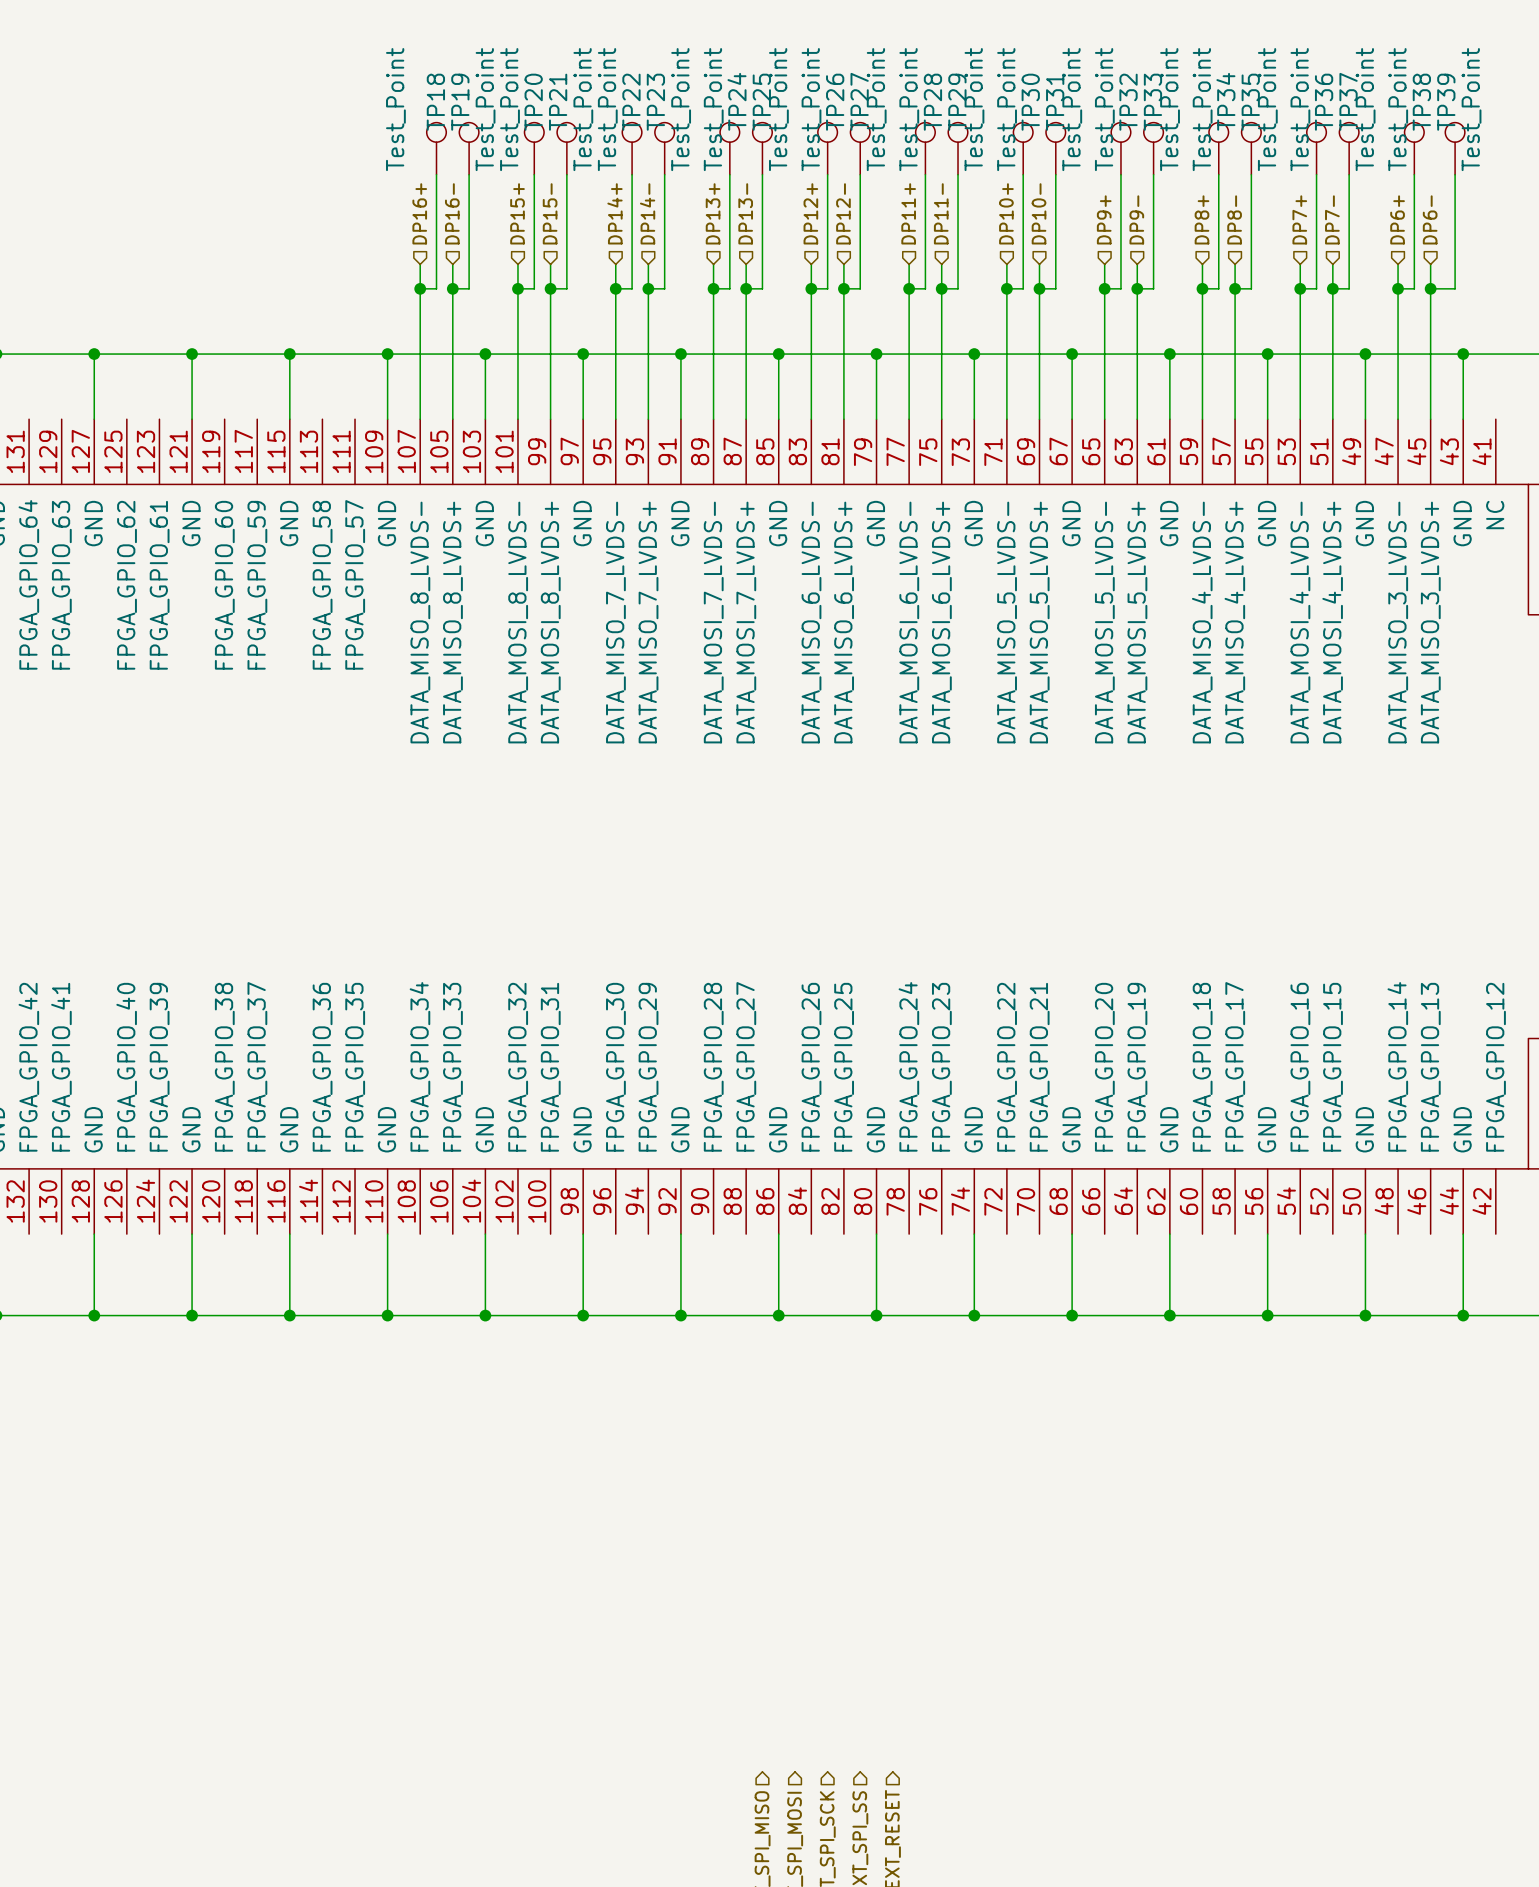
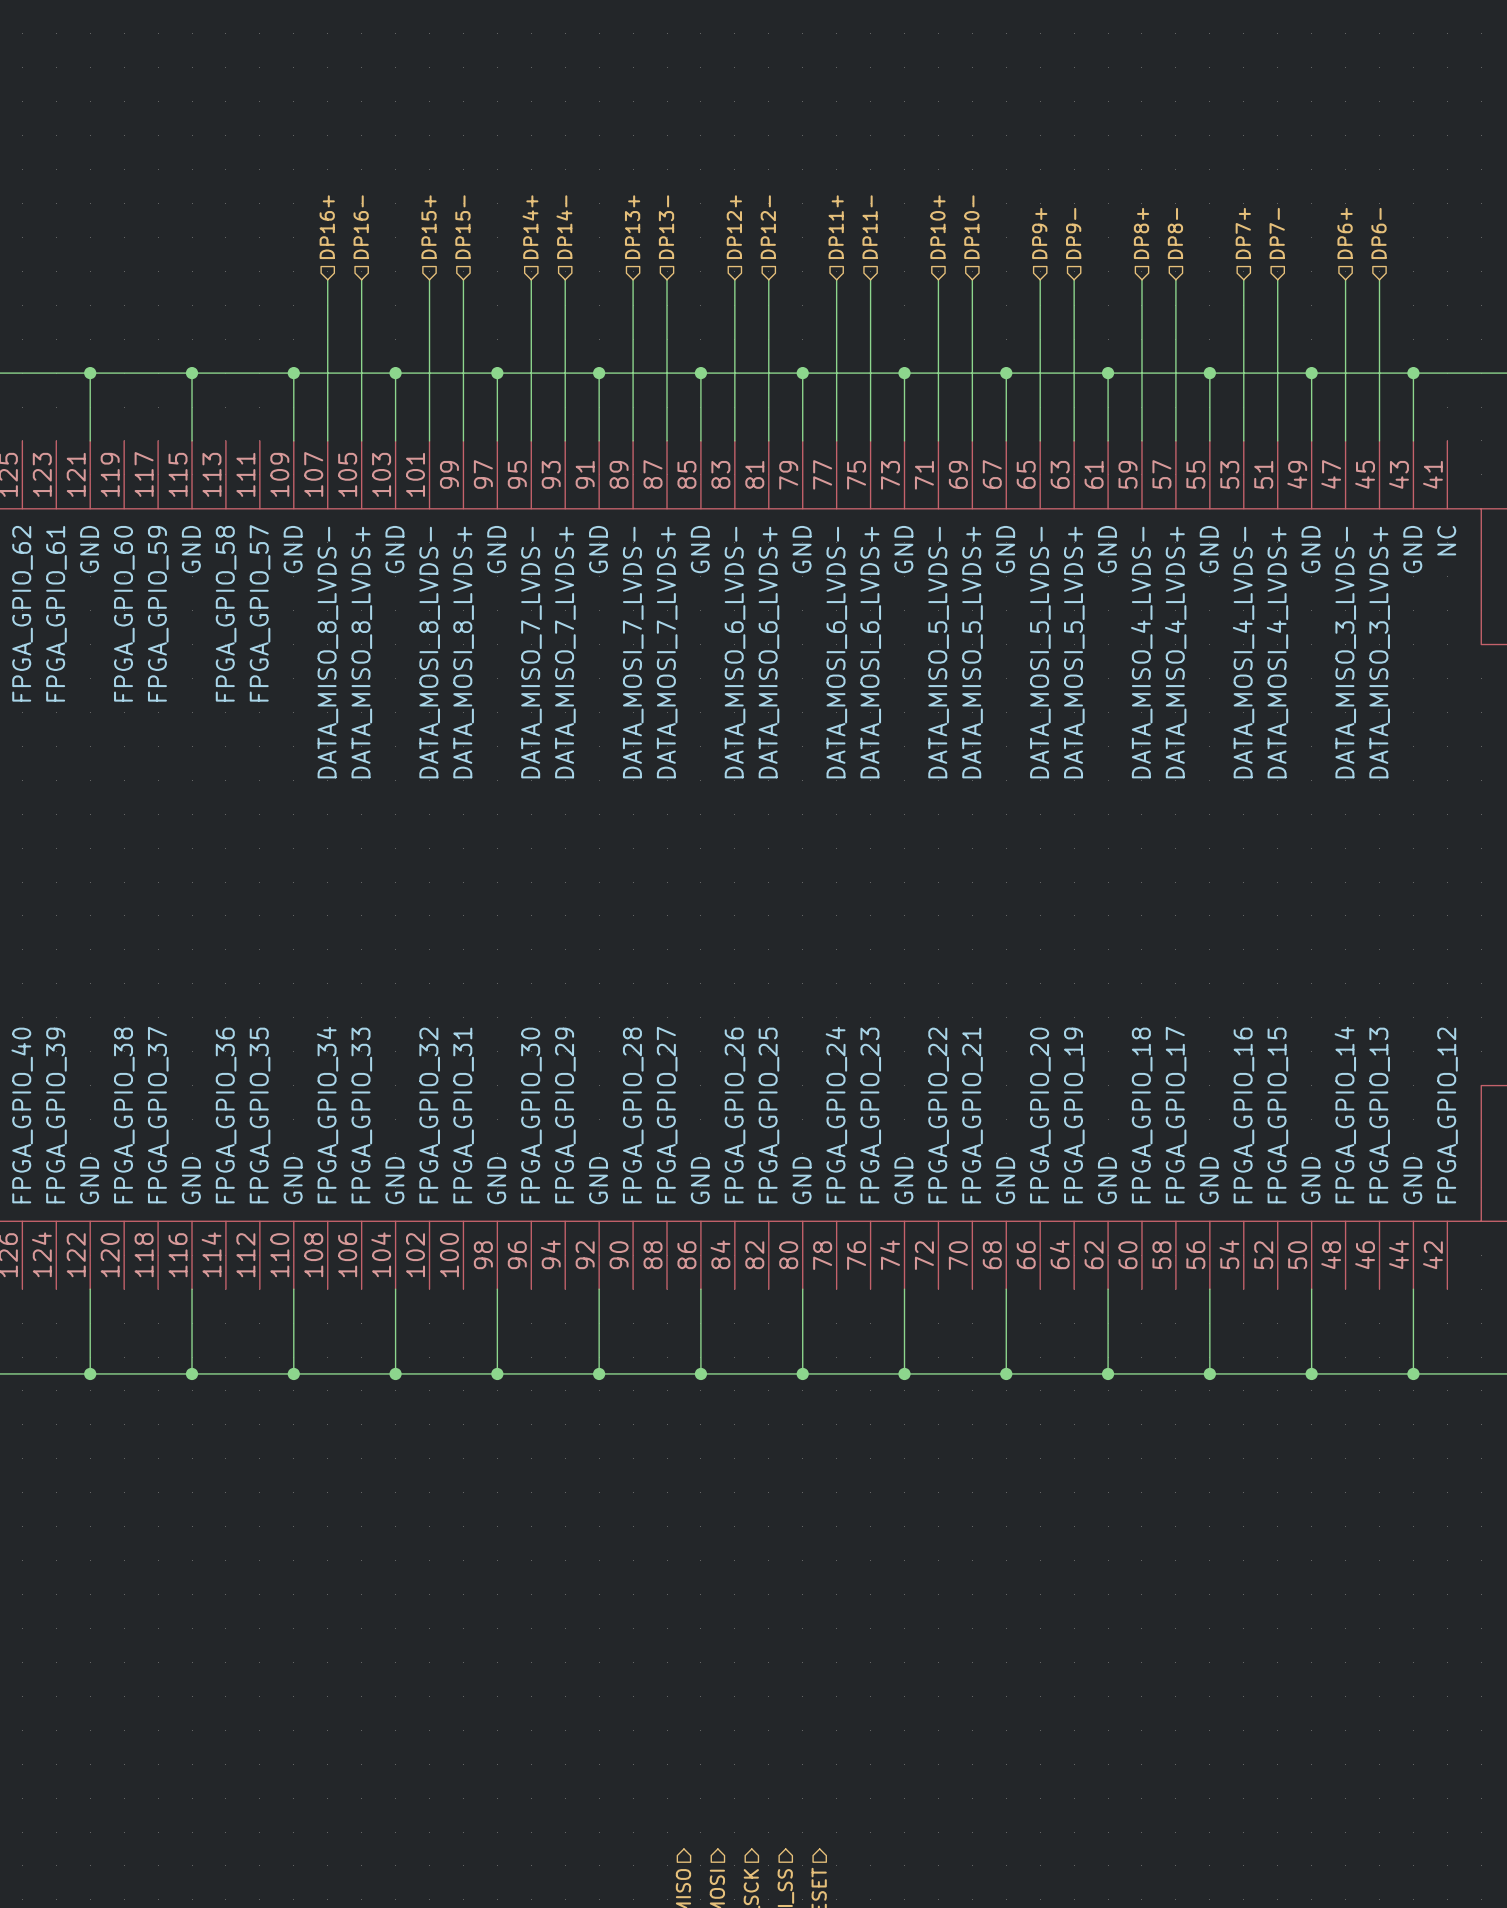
TP18: Test_Point (436, 148) -> none
TP19: Test_Point (469, 148) -> none
TP20: Test_Point (534, 148) -> none
TP21: Test_Point (566, 148) -> none
TP22: Test_Point (632, 148) -> none
TP23: Test_Point (664, 148) -> none
TP24: Test_Point (729, 148) -> none
TP25: Test_Point (762, 148) -> none
TP26: Test_Point (827, 148) -> none
TP27: Test_Point (860, 148) -> none
TP28: Test_Point (925, 148) -> none
TP29: Test_Point (958, 148) -> none
TP30: Test_Point (1023, 148) -> none
TP31: Test_Point (1055, 148) -> none
TP32: Test_Point (1120, 148) -> none
TP33: Test_Point (1153, 148) -> none
TP34: Test_Point (1218, 148) -> none
TP35: Test_Point (1251, 148) -> none
TP36: Test_Point (1316, 148) -> none
TP37: Test_Point (1349, 148) -> none
TP38: Test_Point (1414, 148) -> none
TP39: Test_Point (1455, 148) -> none
wire: (436, 174) (436, 288) (420, 288) -> none
wire: (469, 174) (469, 288) (452, 288) -> none
wire: (534, 174) (534, 288) (517, 288) -> none
wire: (566, 174) (566, 288) (550, 288) -> none
wire: (632, 174) (632, 288) (615, 288) -> none
wire: (664, 174) (664, 288) (648, 288) -> none
wire: (729, 174) (729, 288) (713, 288) -> none
wire: (762, 174) (762, 288) (746, 288) -> none
wire: (827, 174) (827, 288) (811, 288) -> none
wire: (860, 174) (860, 288) (843, 288) -> none
wire: (925, 174) (925, 288) (909, 288) -> none
wire: (958, 174) (958, 288) (941, 288) -> none
wire: (1023, 174) (1023, 288) (1006, 288) -> none
wire: (1055, 174) (1055, 288) (1039, 288) -> none
wire: (1120, 174) (1120, 288) (1104, 288) -> none
wire: (1153, 174) (1153, 288) (1137, 288) -> none
wire: (1218, 174) (1218, 288) (1202, 288) -> none
wire: (1251, 174) (1251, 288) (1235, 288) -> none
wire: (1316, 174) (1316, 288) (1300, 288) -> none
wire: (1349, 174) (1349, 288) (1332, 288) -> none
wire: (1414, 174) (1414, 288) (1398, 288) -> none
wire: (1455, 174) (1455, 288) (1430, 288) -> none
junction: (420, 288) -> none
junction: (452, 288) -> none
junction: (517, 288) -> none
junction: (550, 288) -> none
junction: (615, 288) -> none
junction: (648, 288) -> none
junction: (713, 288) -> none
junction: (746, 288) -> none
junction: (811, 288) -> none
junction: (843, 288) -> none
junction: (909, 288) -> none
junction: (941, 288) -> none
junction: (1006, 288) -> none
junction: (1039, 288) -> none
junction: (1104, 288) -> none
junction: (1137, 288) -> none
junction: (1202, 288) -> none
junction: (1235, 288) -> none
junction: (1300, 288) -> none
junction: (1332, 288) -> none
junction: (1398, 288) -> none
junction: (1430, 288) -> none

